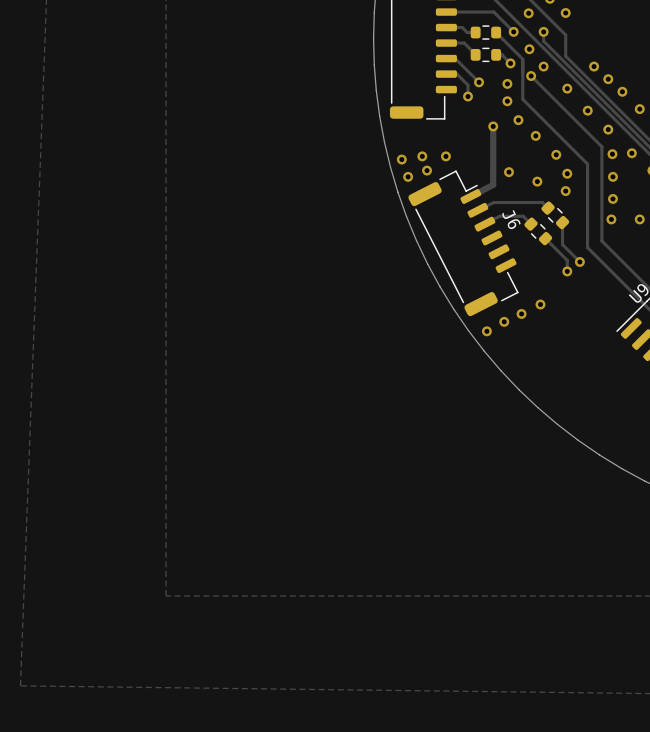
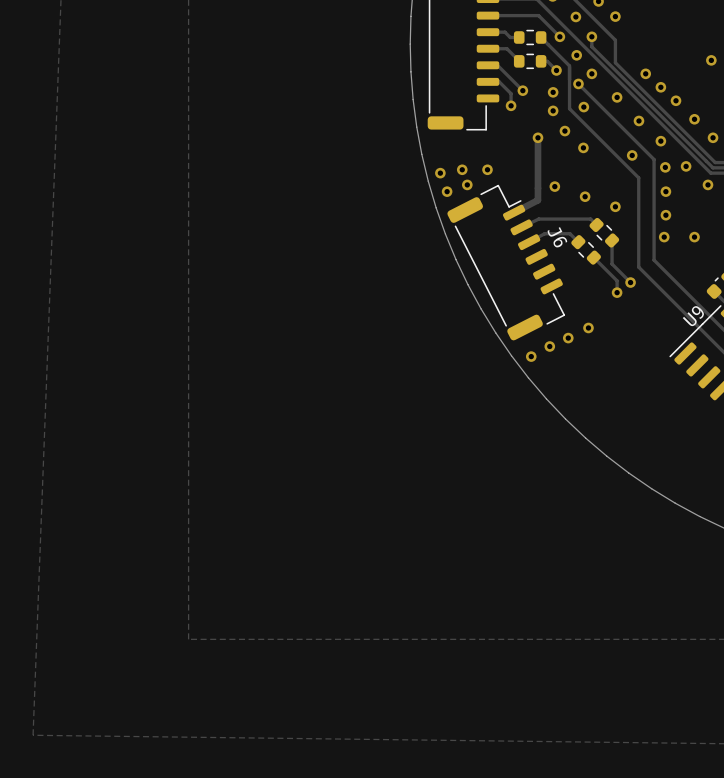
via: none -> (583, 107)
via: none -> (632, 155)
via: (556, 154) -> none
via: (567, 173) -> none

